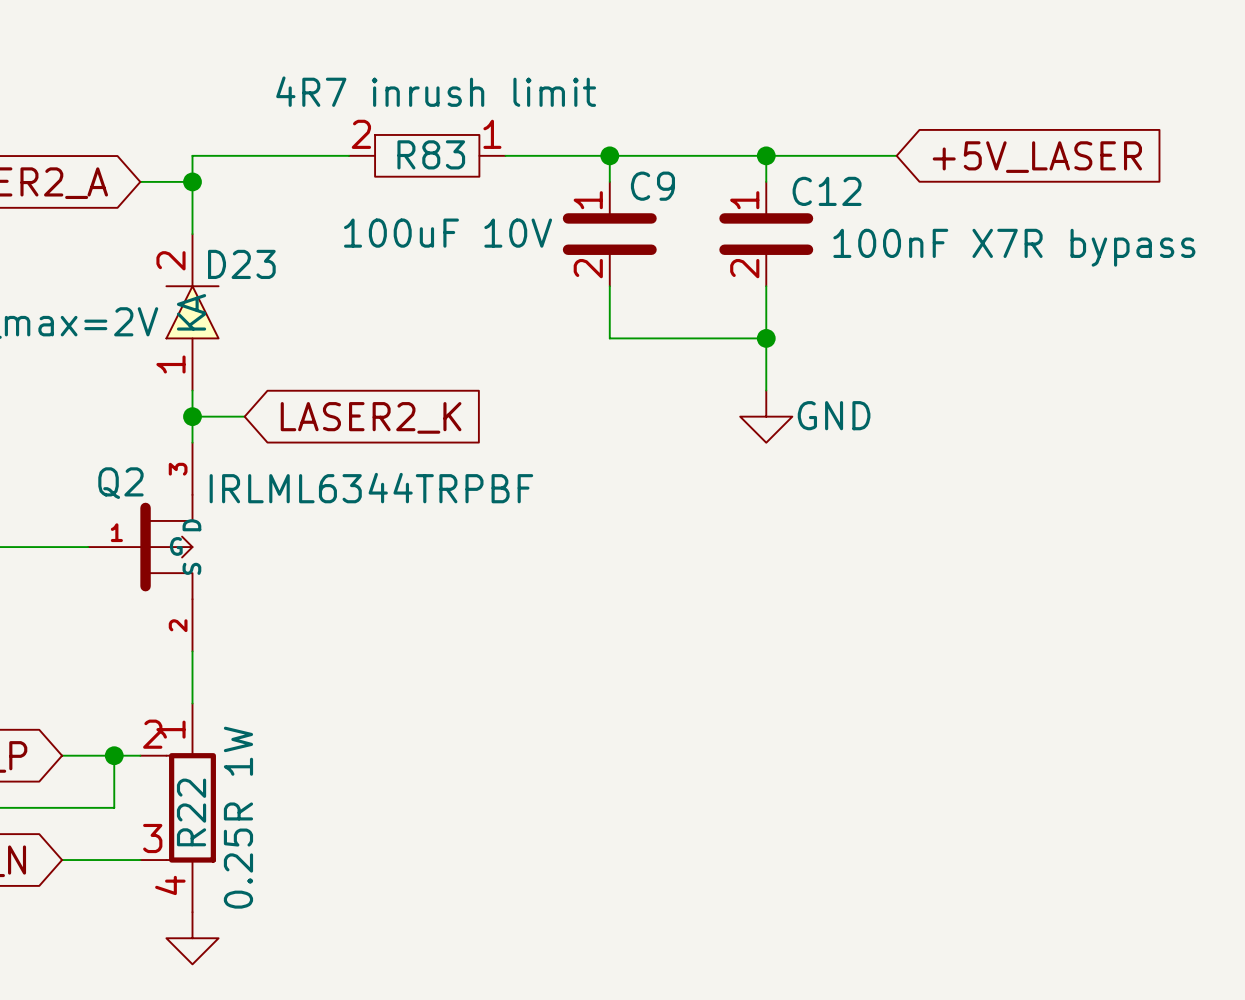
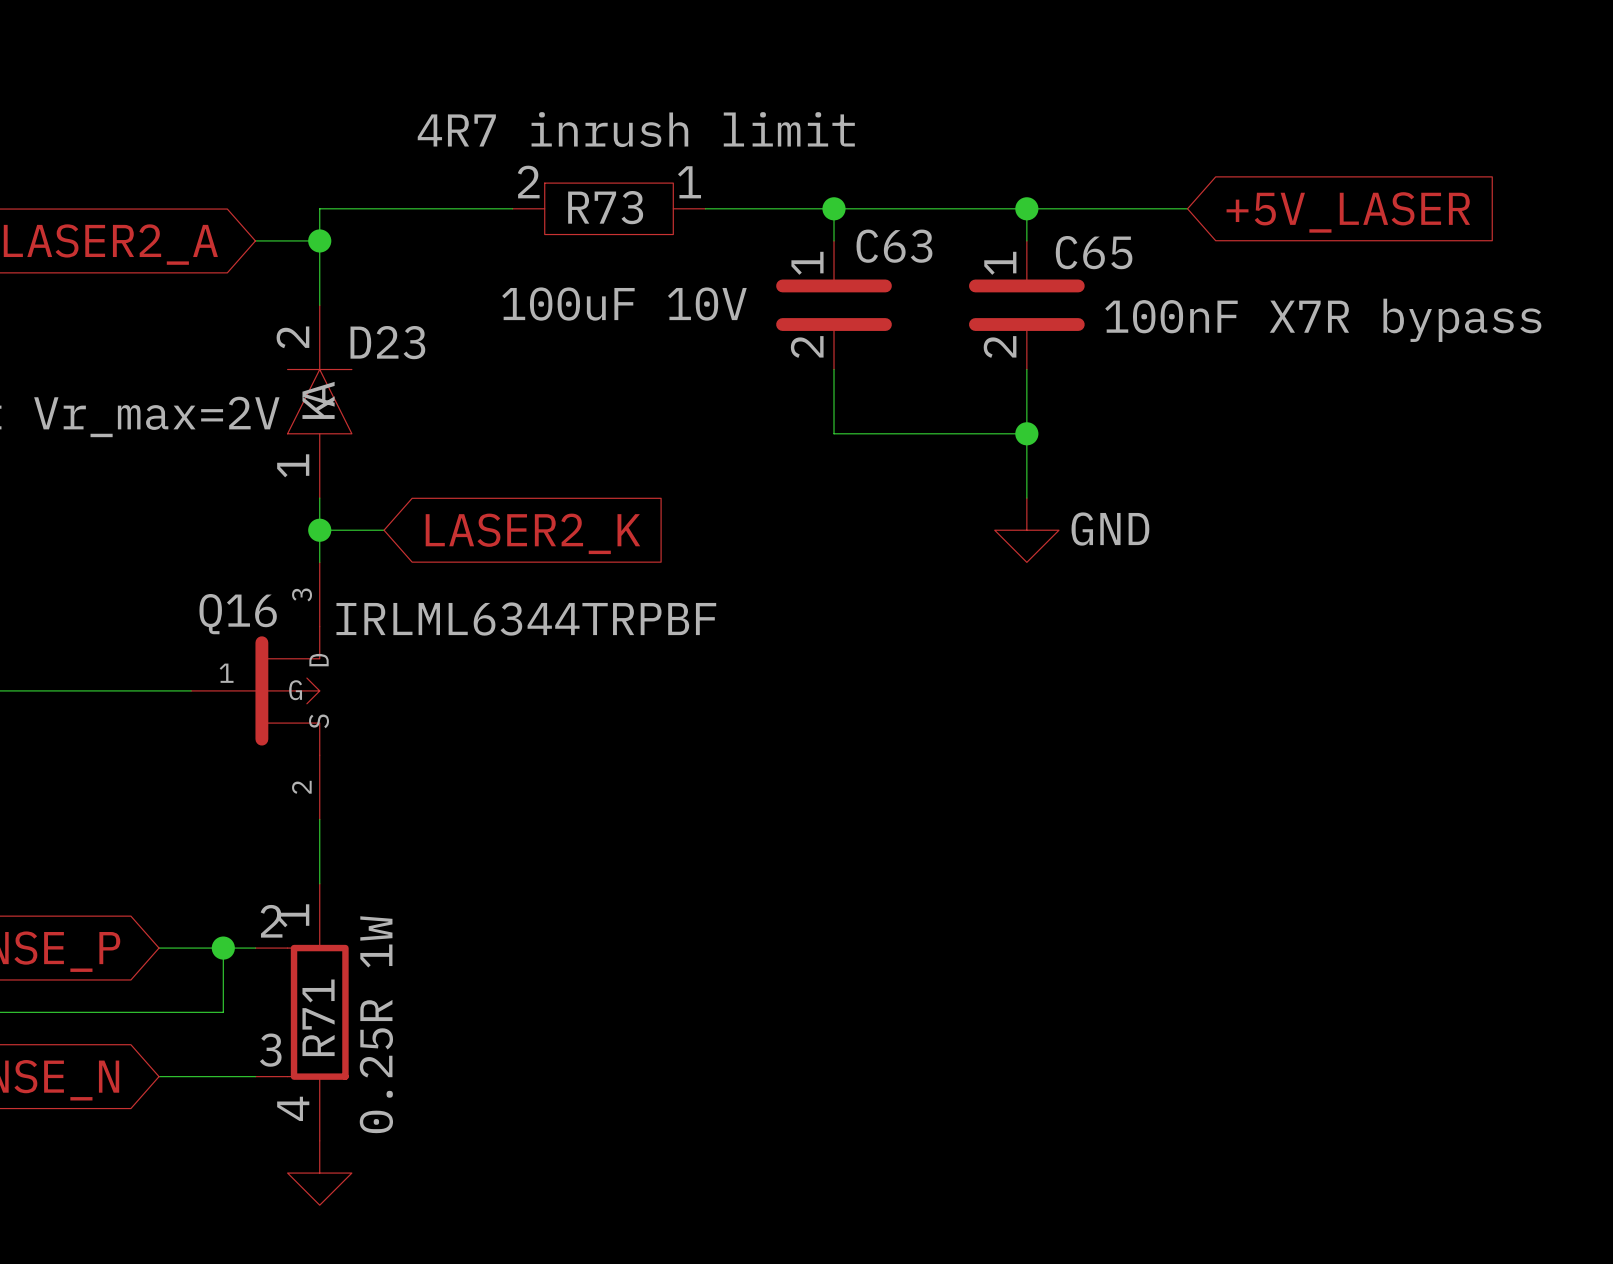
R83 name: R83 (431, 154) -> R73 (605, 207)
C9 name: C9 (652, 186) -> C63 (894, 246)
C12 name: C12 (827, 191) -> C65 (1094, 252)
Q2 name: Q2 (120, 483) -> Q16 (238, 614)
R22 name: R22 (191, 812) -> R71 (318, 1017)

